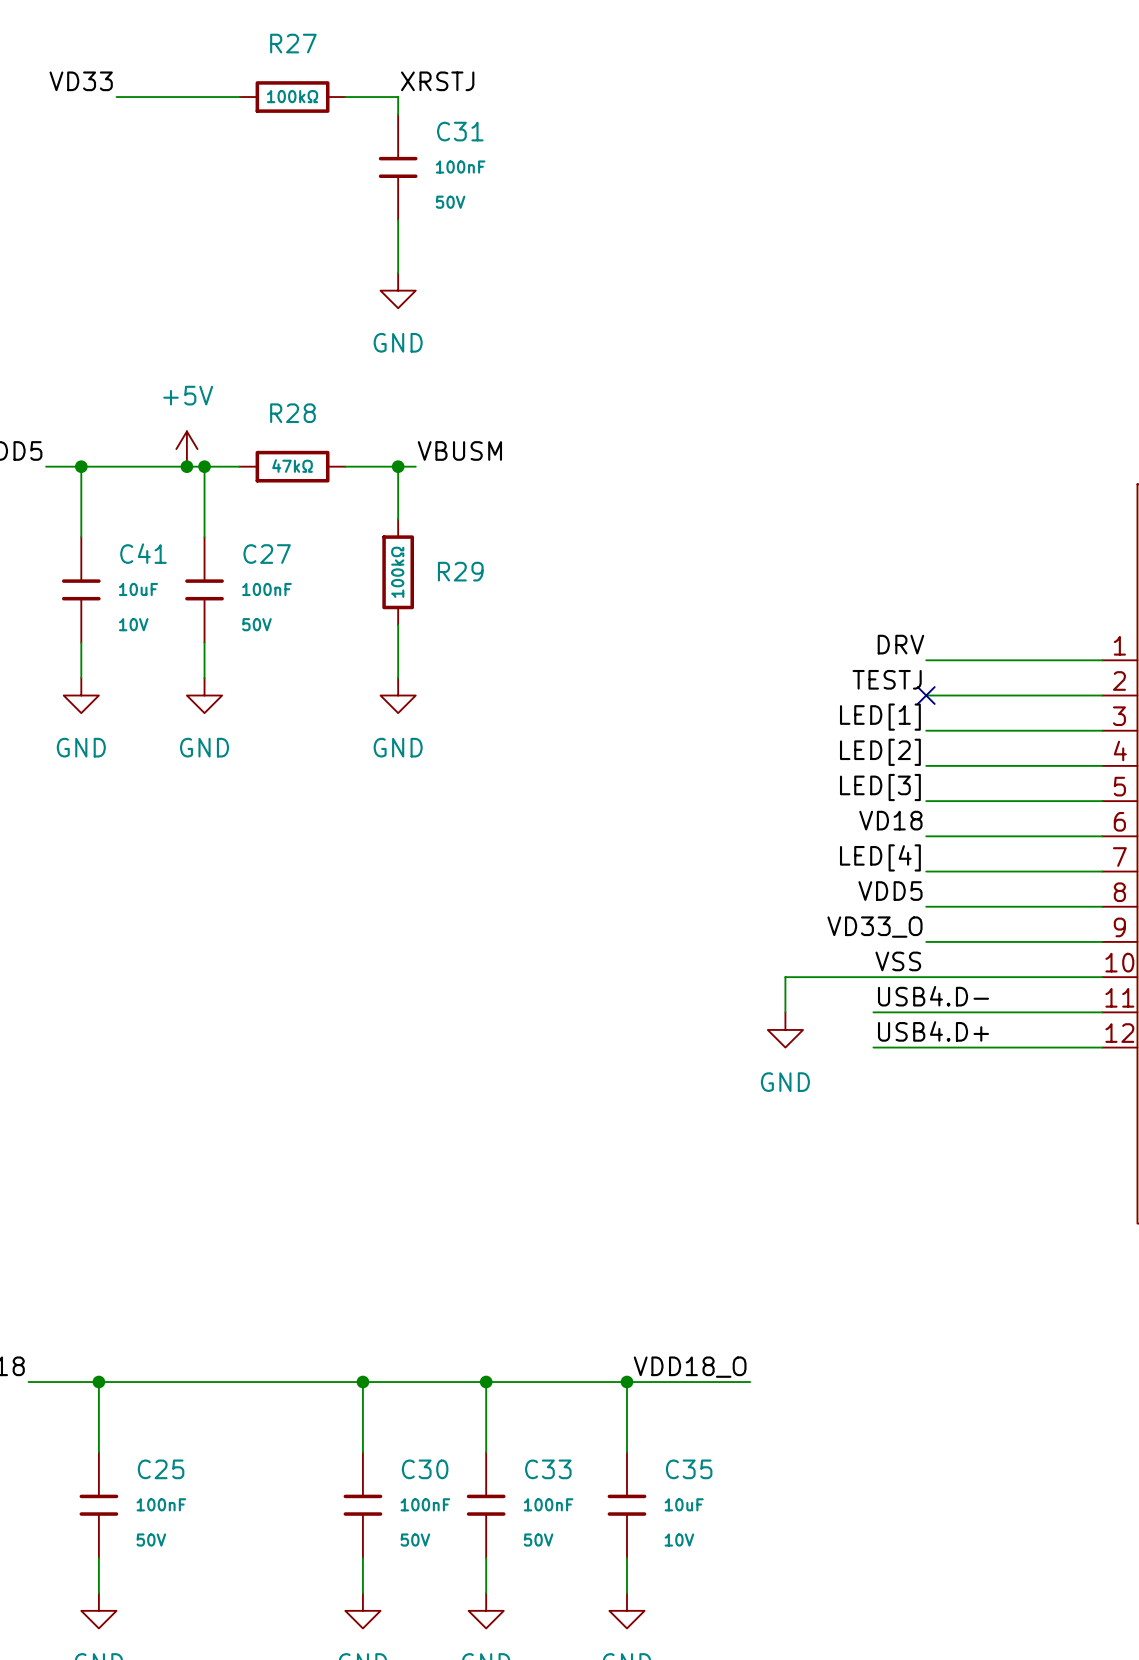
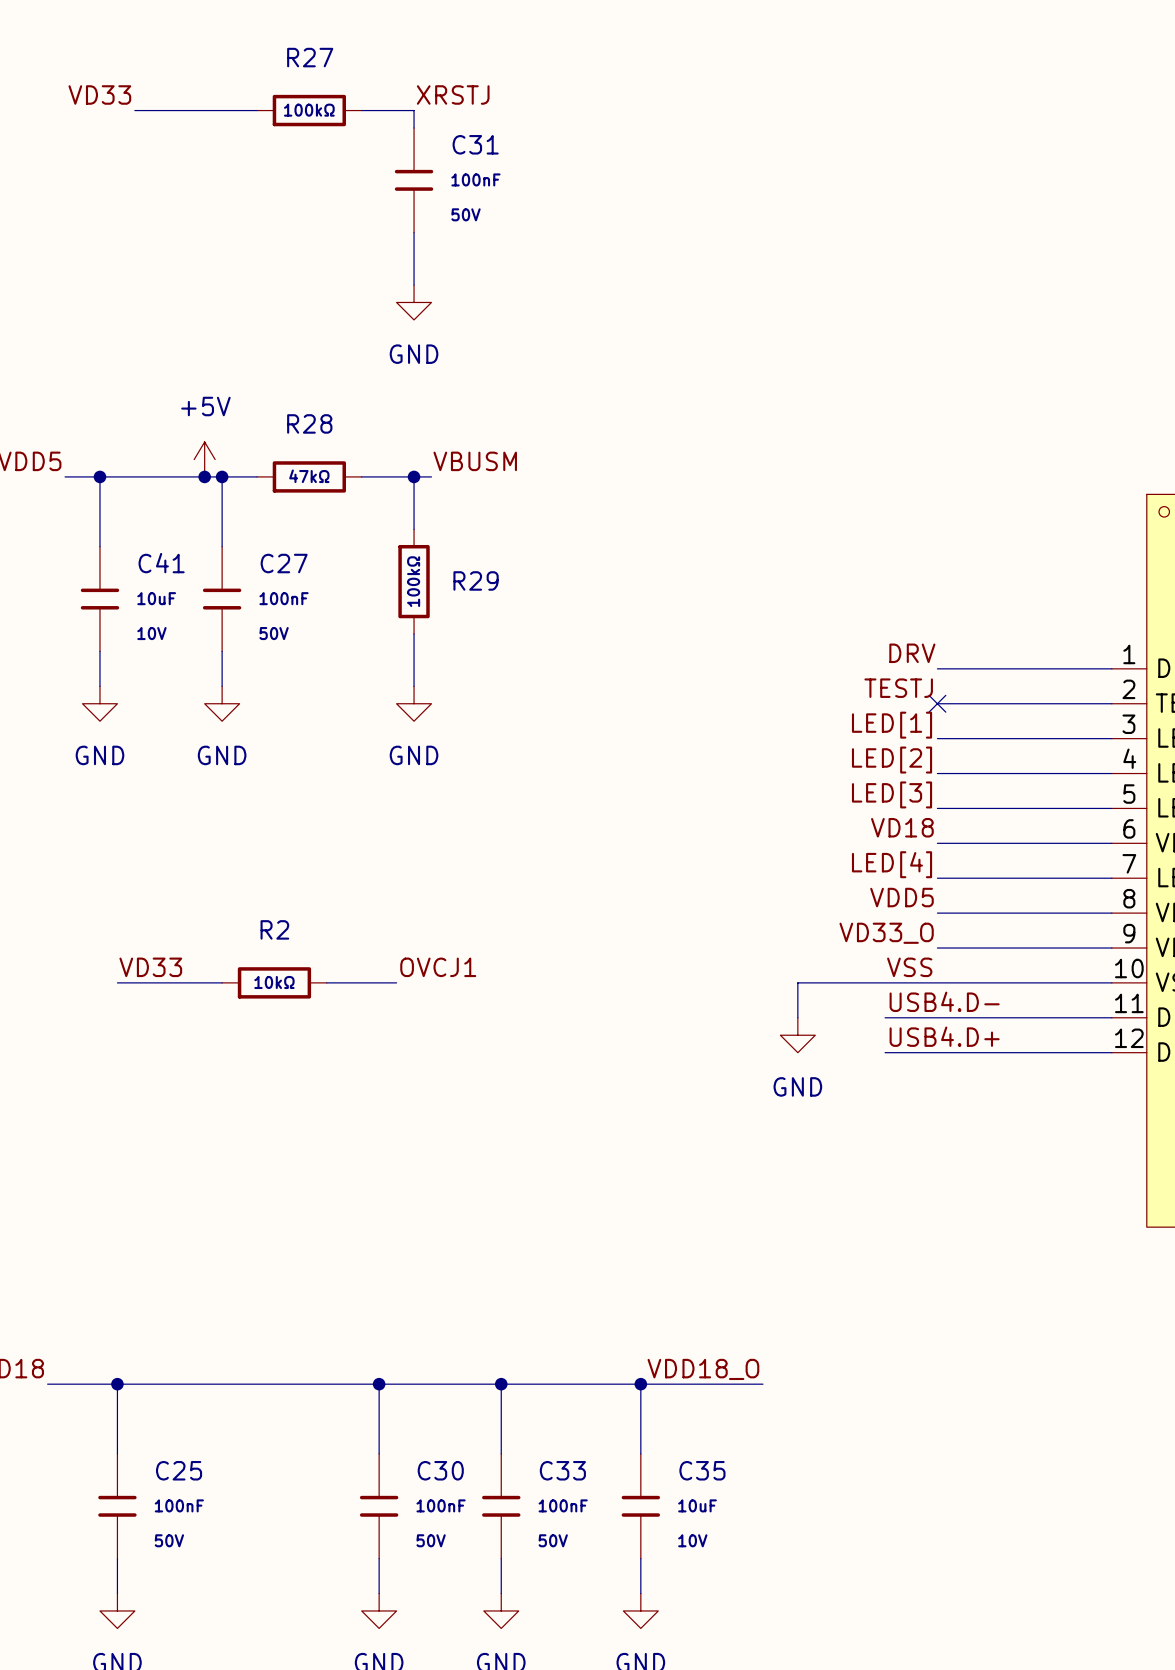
label: none -> VD33 (150, 967)
label: none -> OVCJ1 (438, 967)
wire: none -> (117, 982) (222, 982)
R2: none -> 10kΩ (274, 982)
wire: none -> (326, 982) (396, 982)

